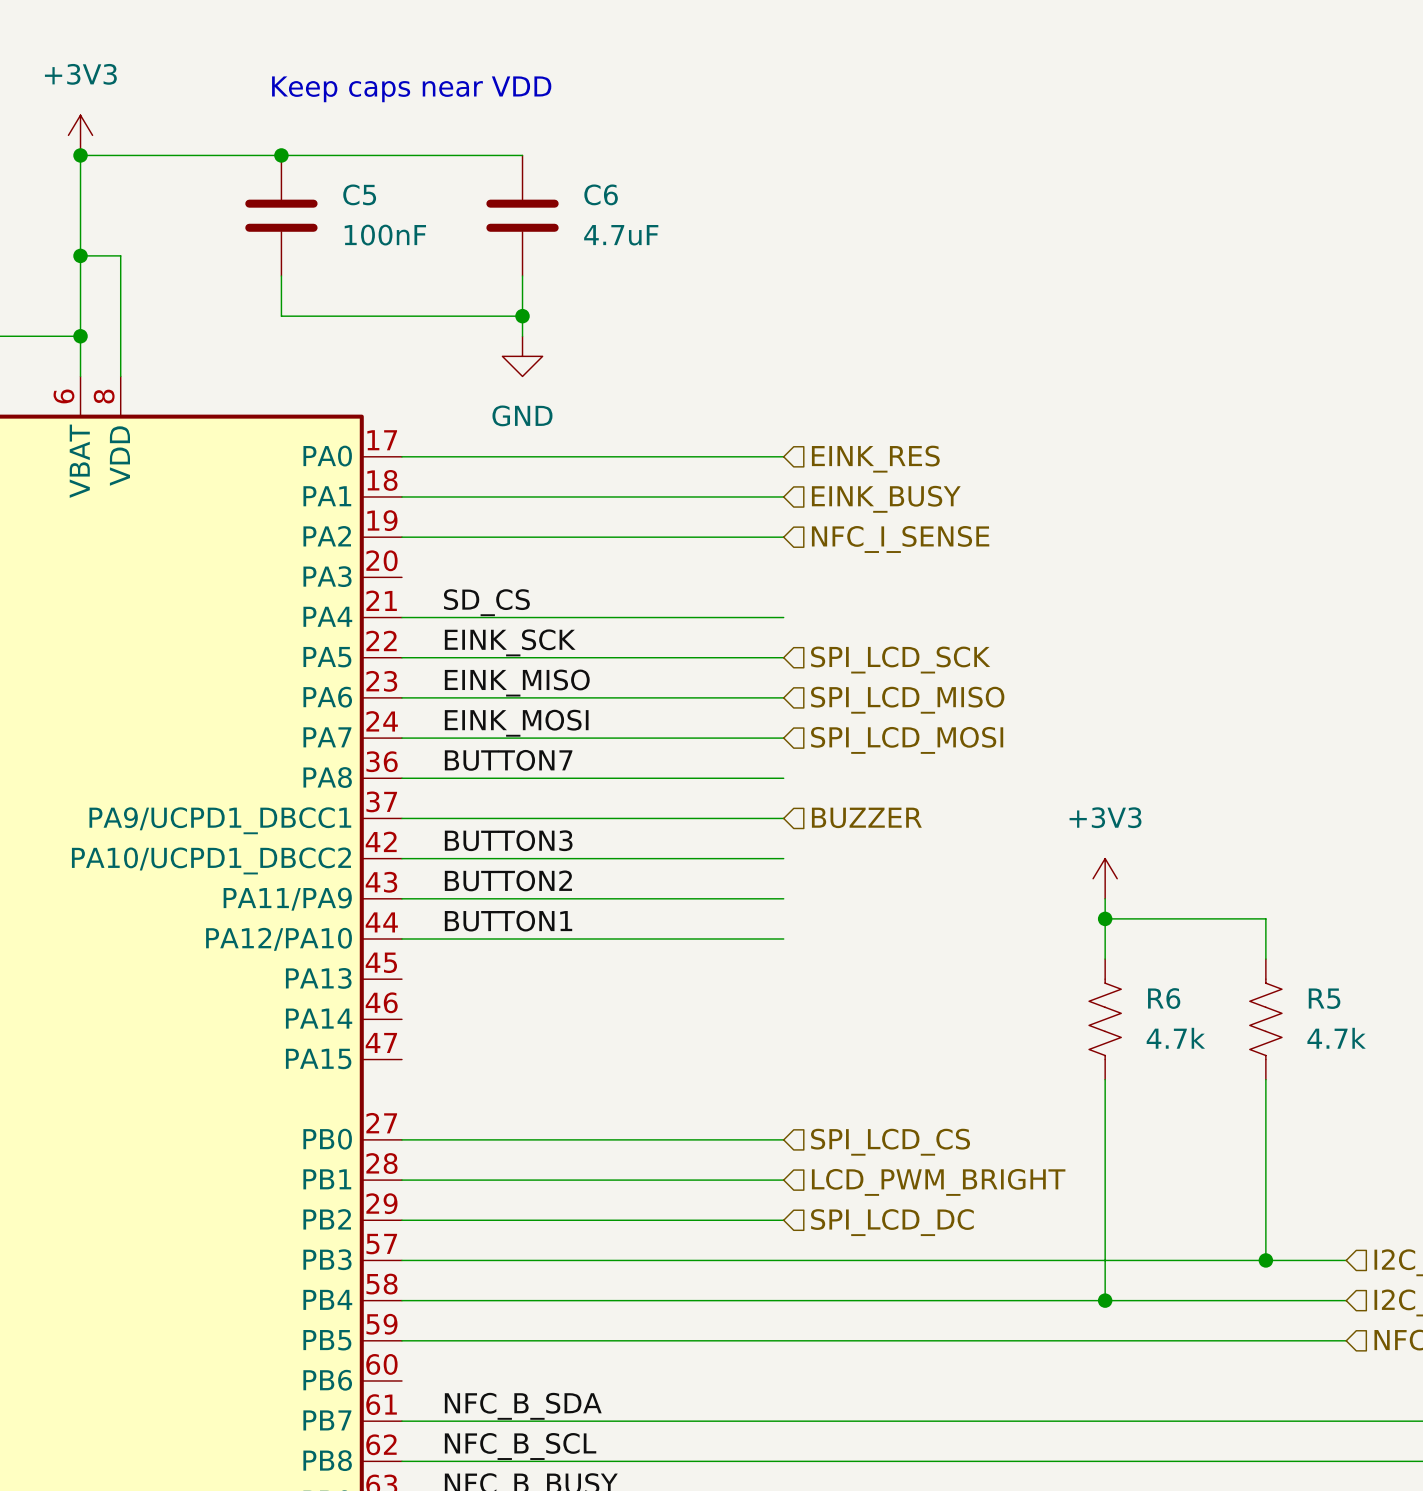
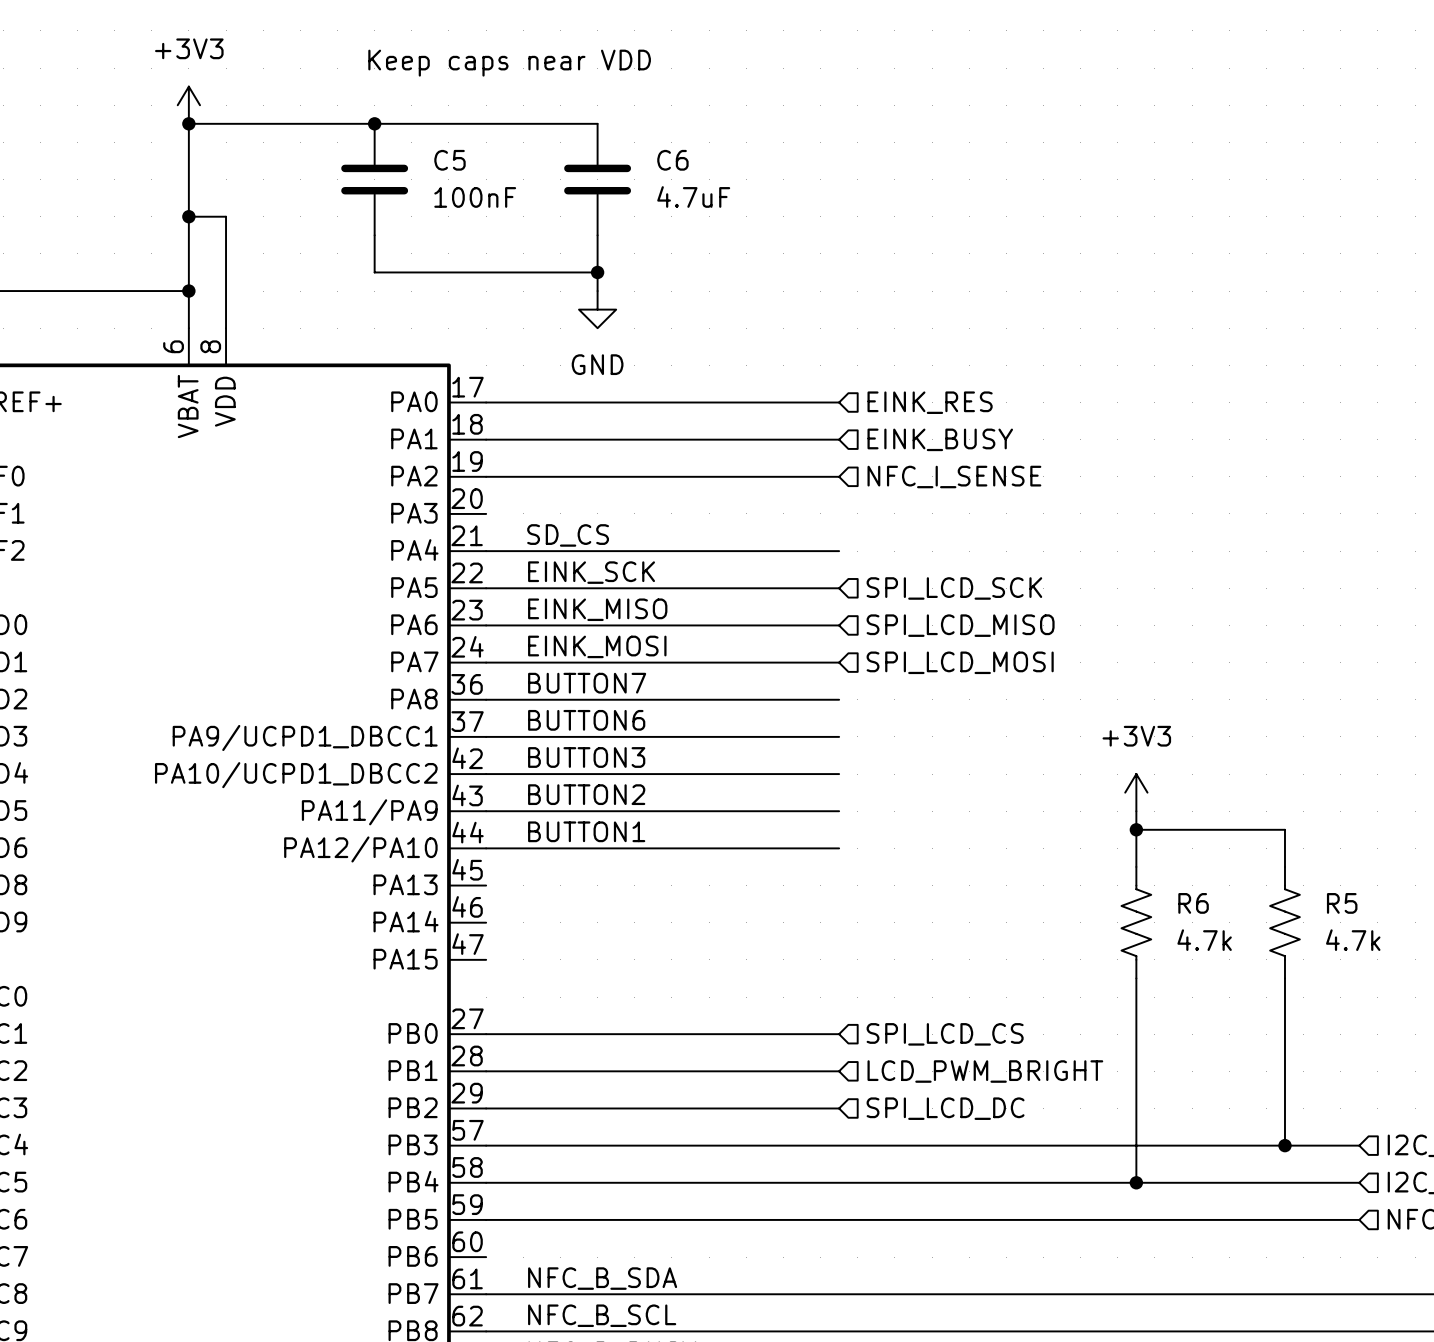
label: none -> BUTTON6 (586, 720)
hierarchical label: BUZZER (866, 817) -> none

